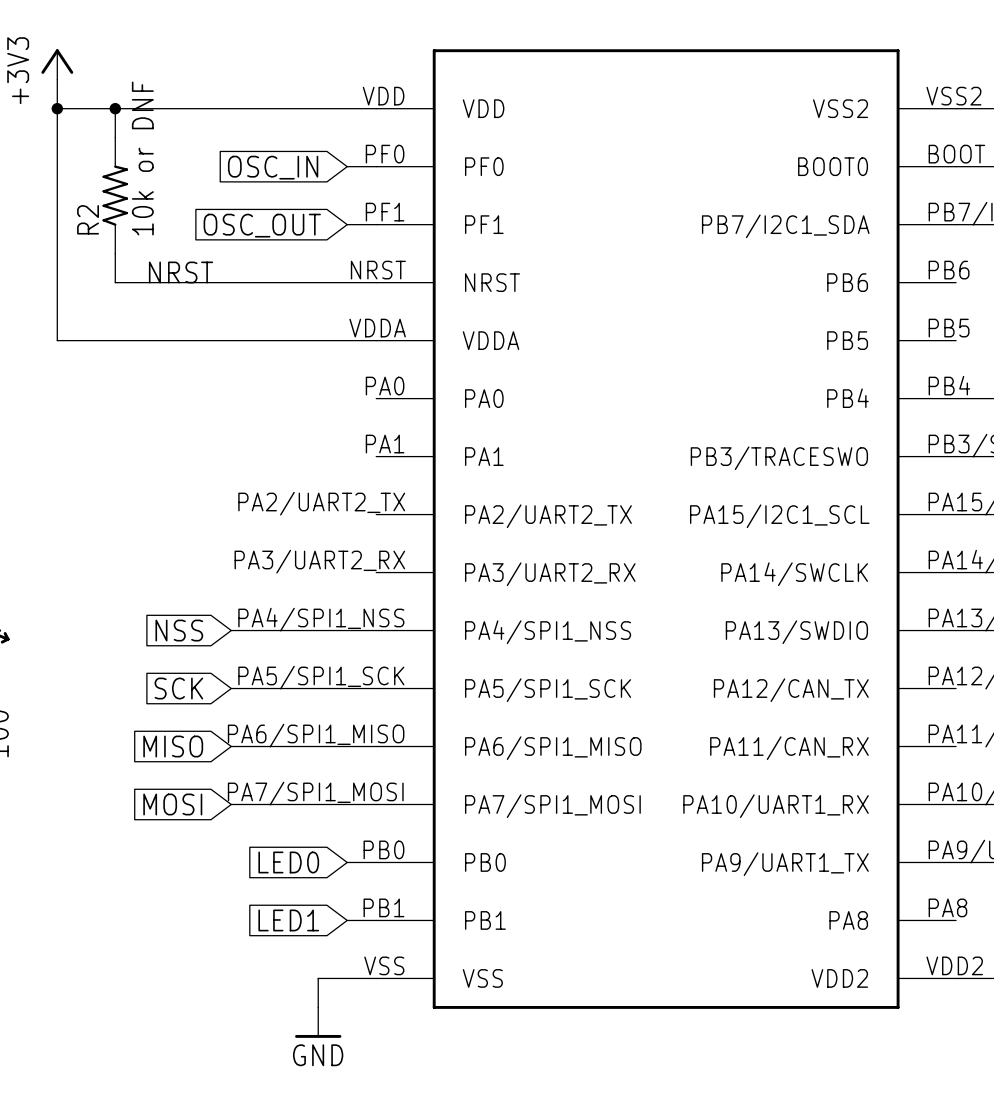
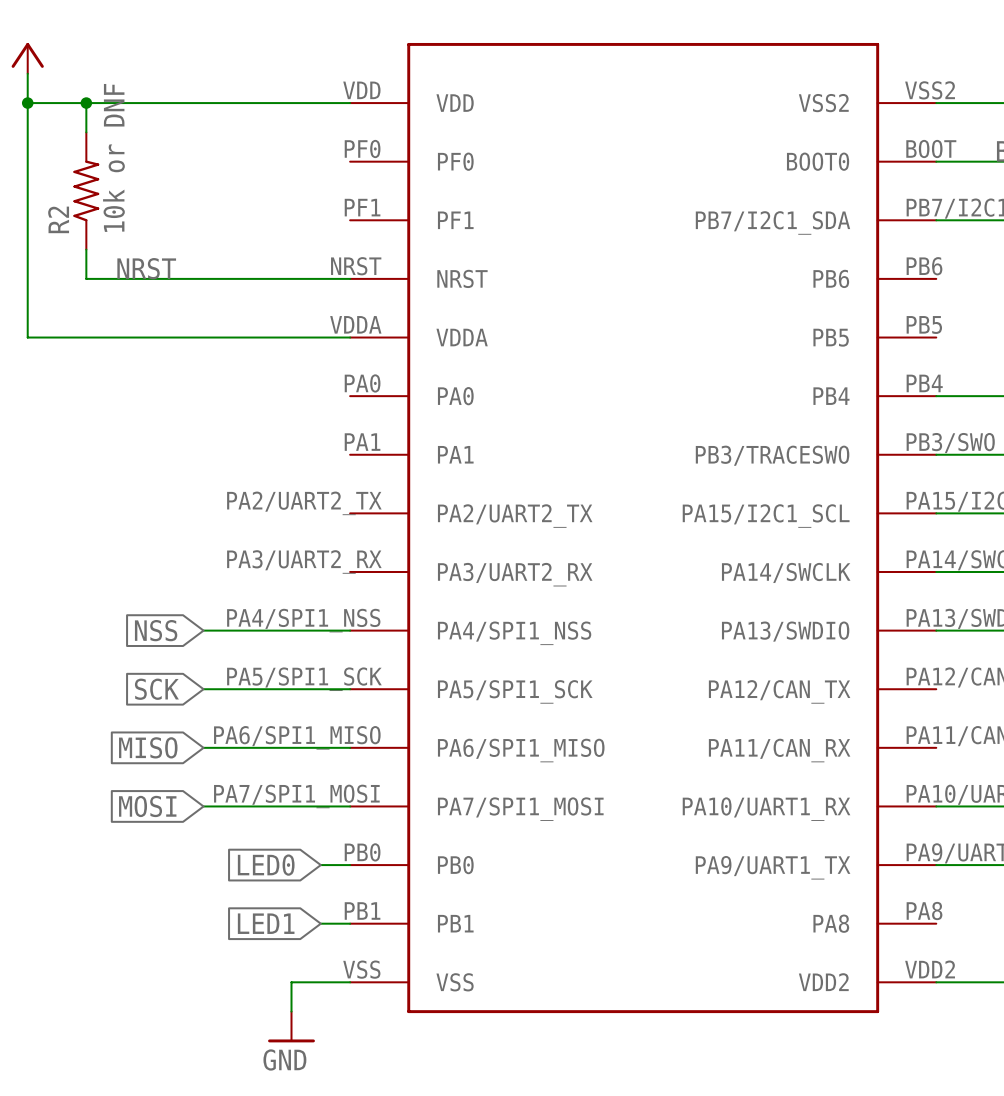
wire: (347, 166) (376, 166) -> none
global label: OSC_IN (273, 167) -> none
wire: (347, 224) (376, 224) -> none
global label: OSC_OUT (262, 225) -> none

